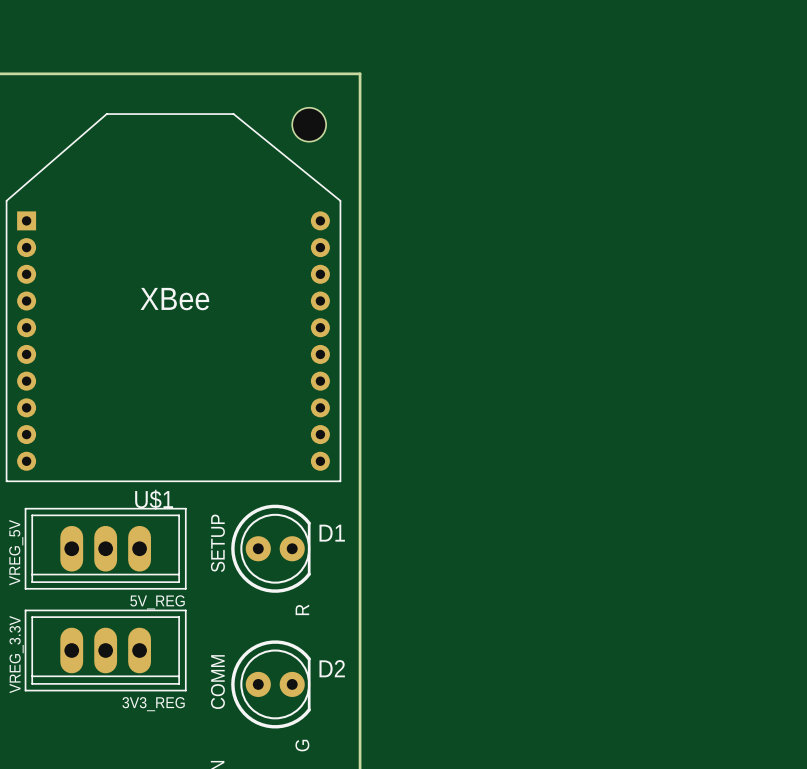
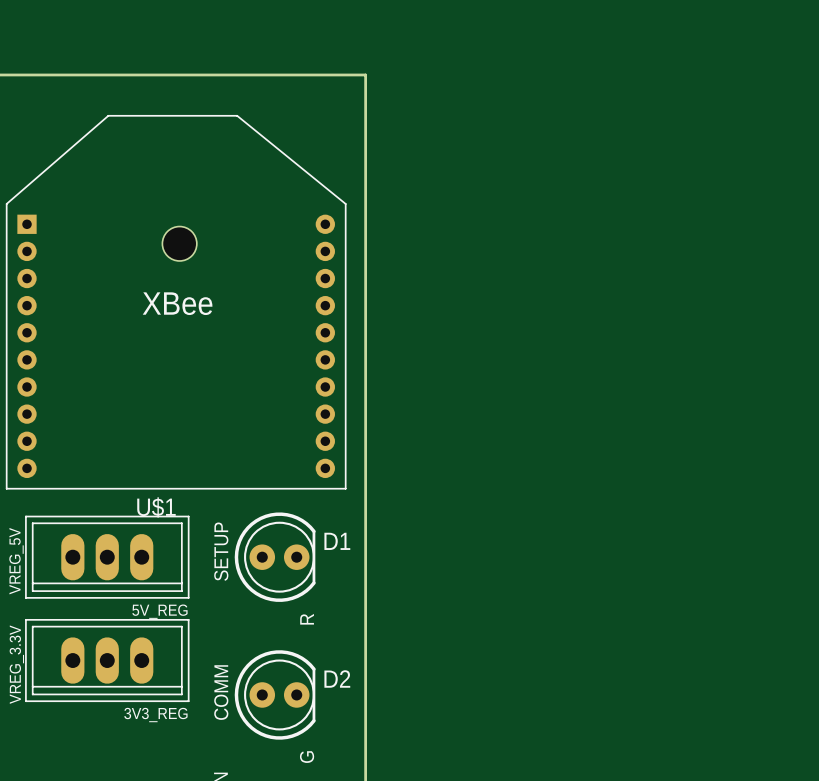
hole position: (309, 124) -> (179, 243)

